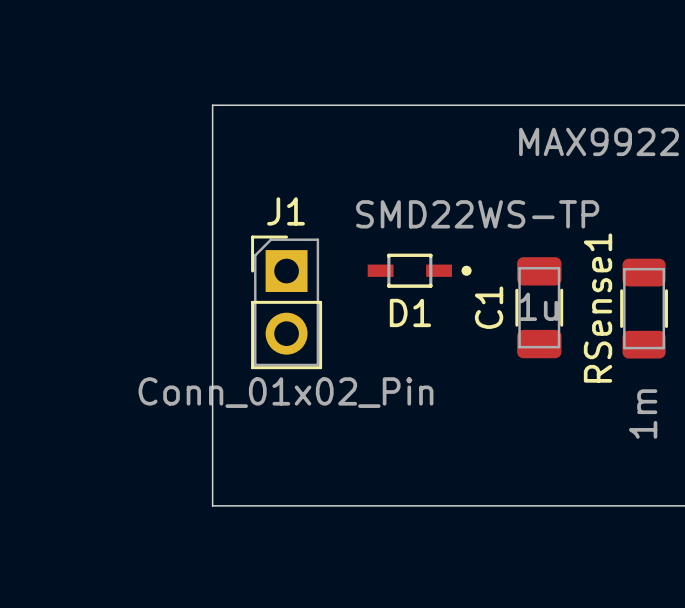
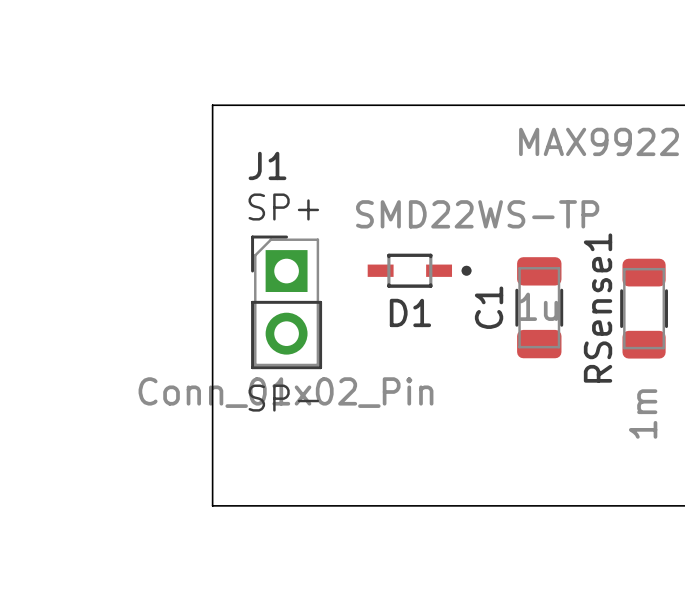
text: none -> SP+ (283, 207)
J1 name position: J1 (285, 211) -> J1 (267, 165)
text: none -> SP- (283, 398)

